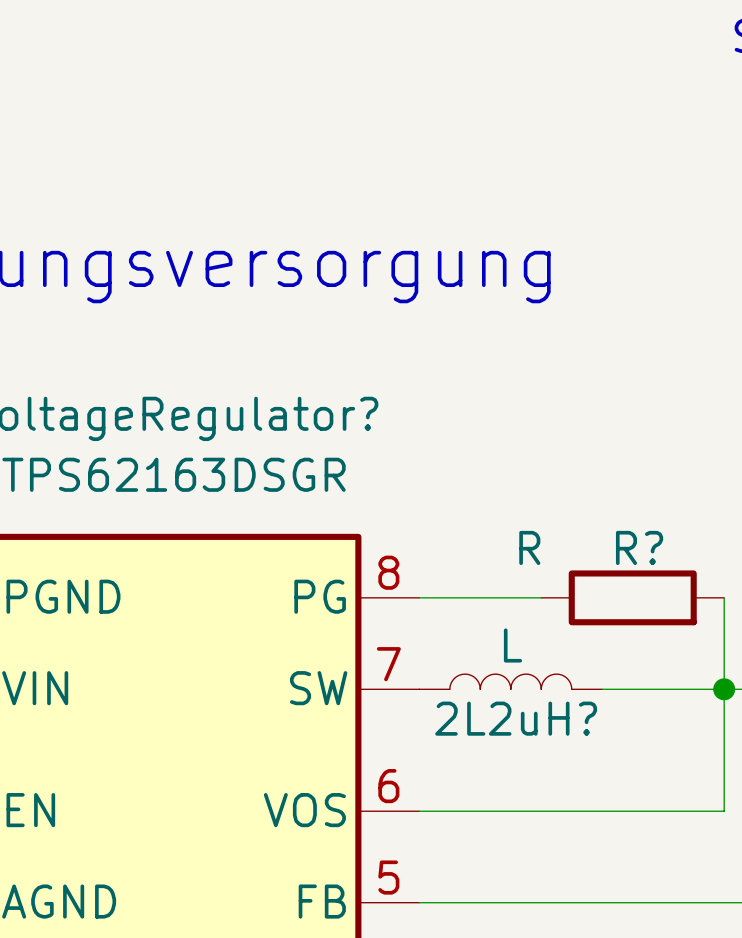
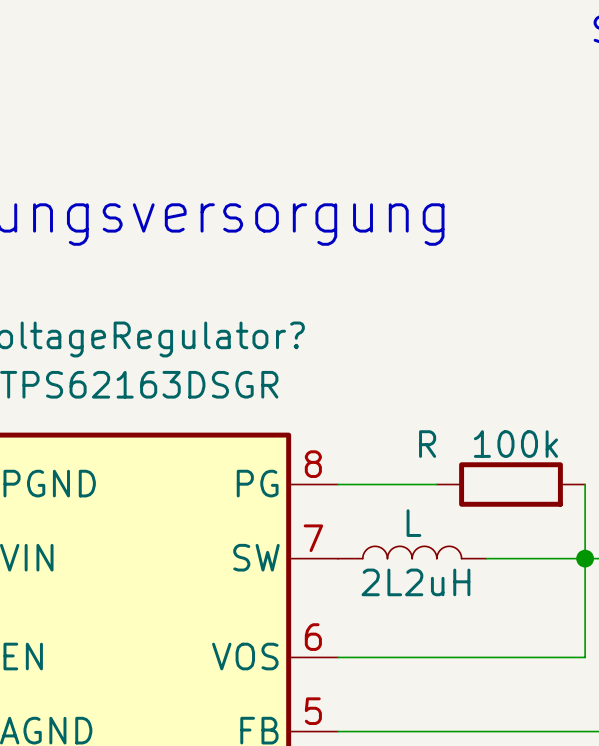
R? name: R? (639, 547) -> 100k (515, 444)
2L2uH? name: 2L2uH? (516, 718) -> 2L2uH (415, 582)

